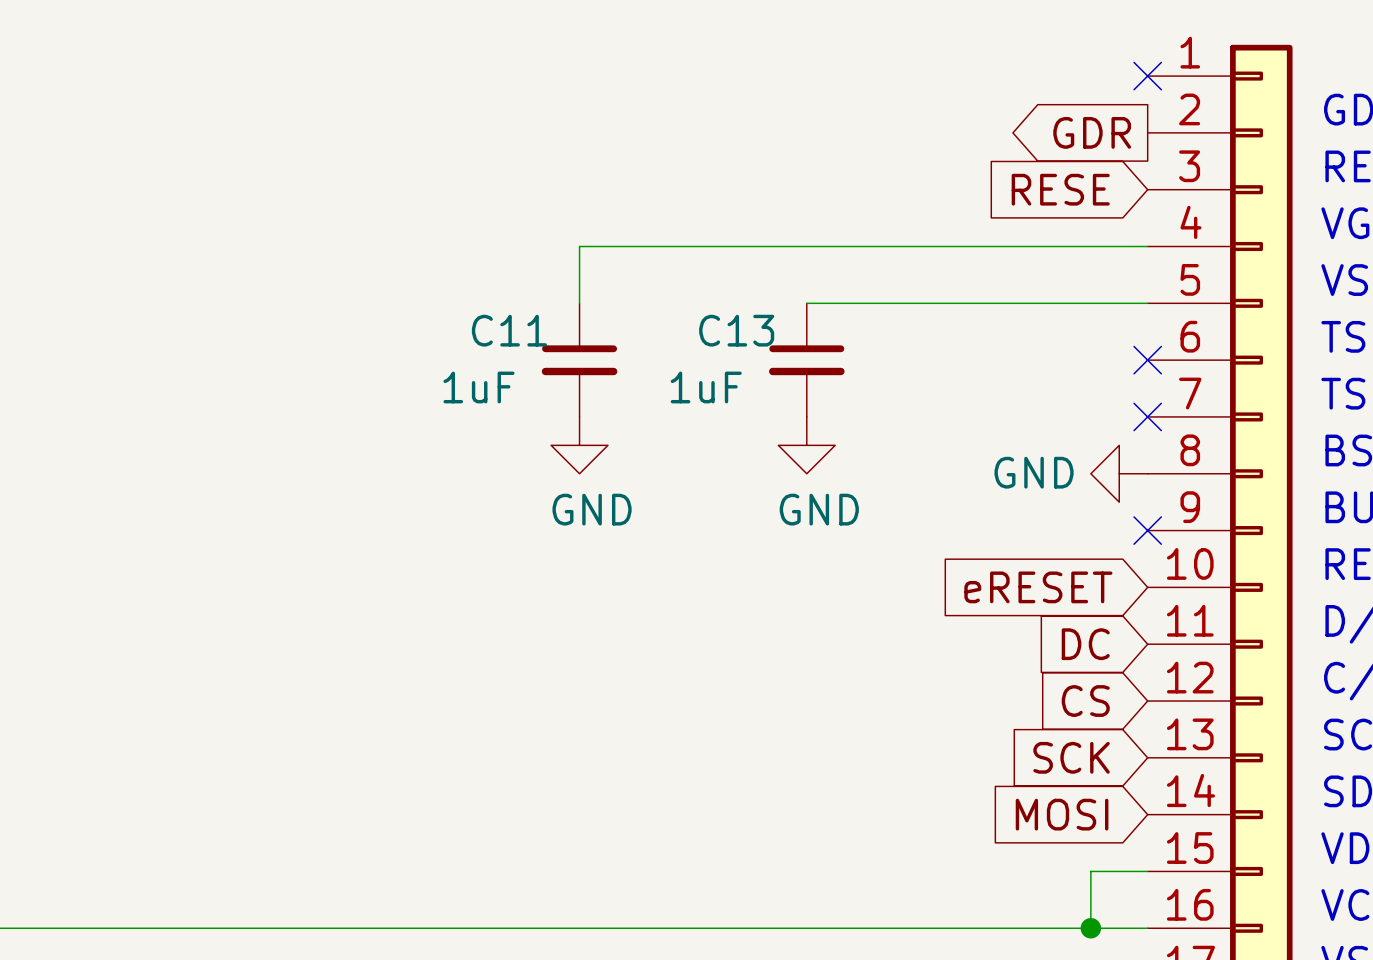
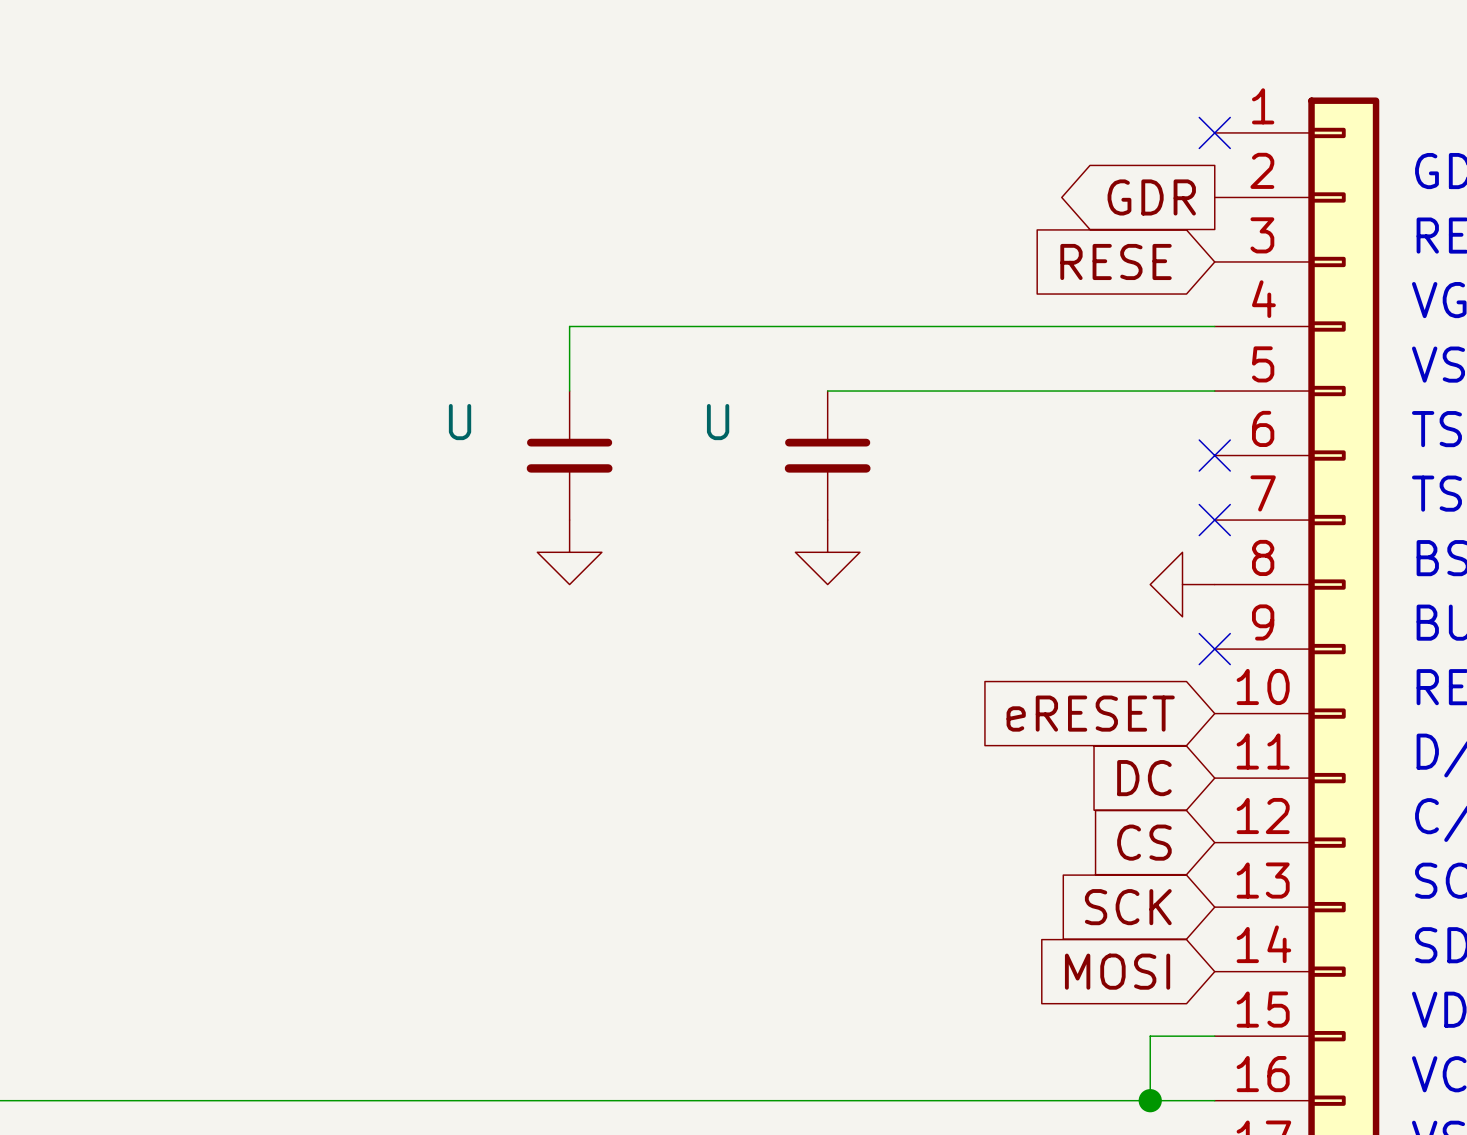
C11 name: C11 (509, 330) -> U (460, 422)
C13 name: C13 (736, 330) -> U (718, 422)
C11 value: 1uF (478, 387) -> none
C13 value: 1uF (706, 387) -> none
power symbol text: GND (1034, 472) -> none
power symbol text: GND (592, 509) -> none
power symbol text: GND (819, 509) -> none

